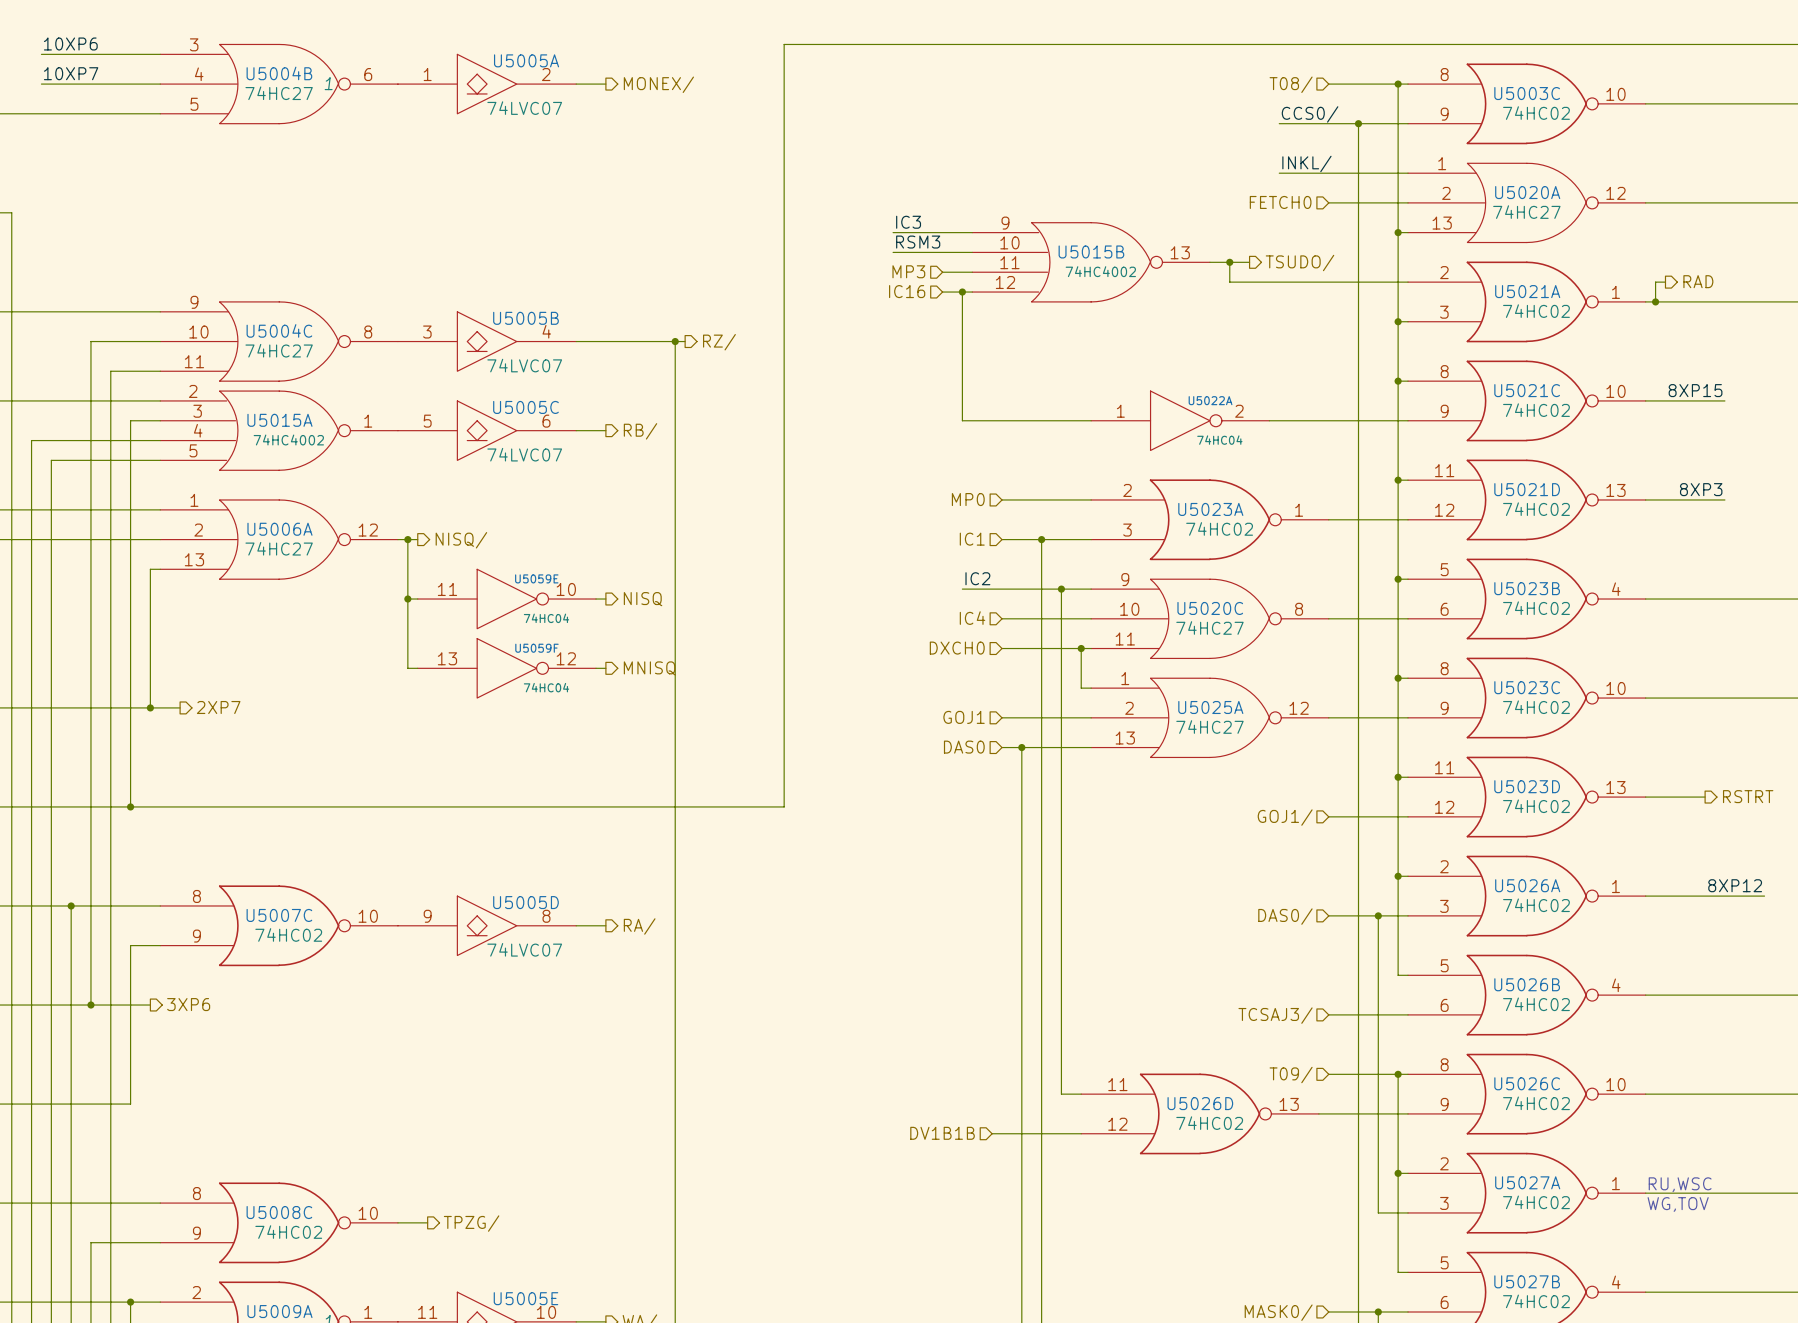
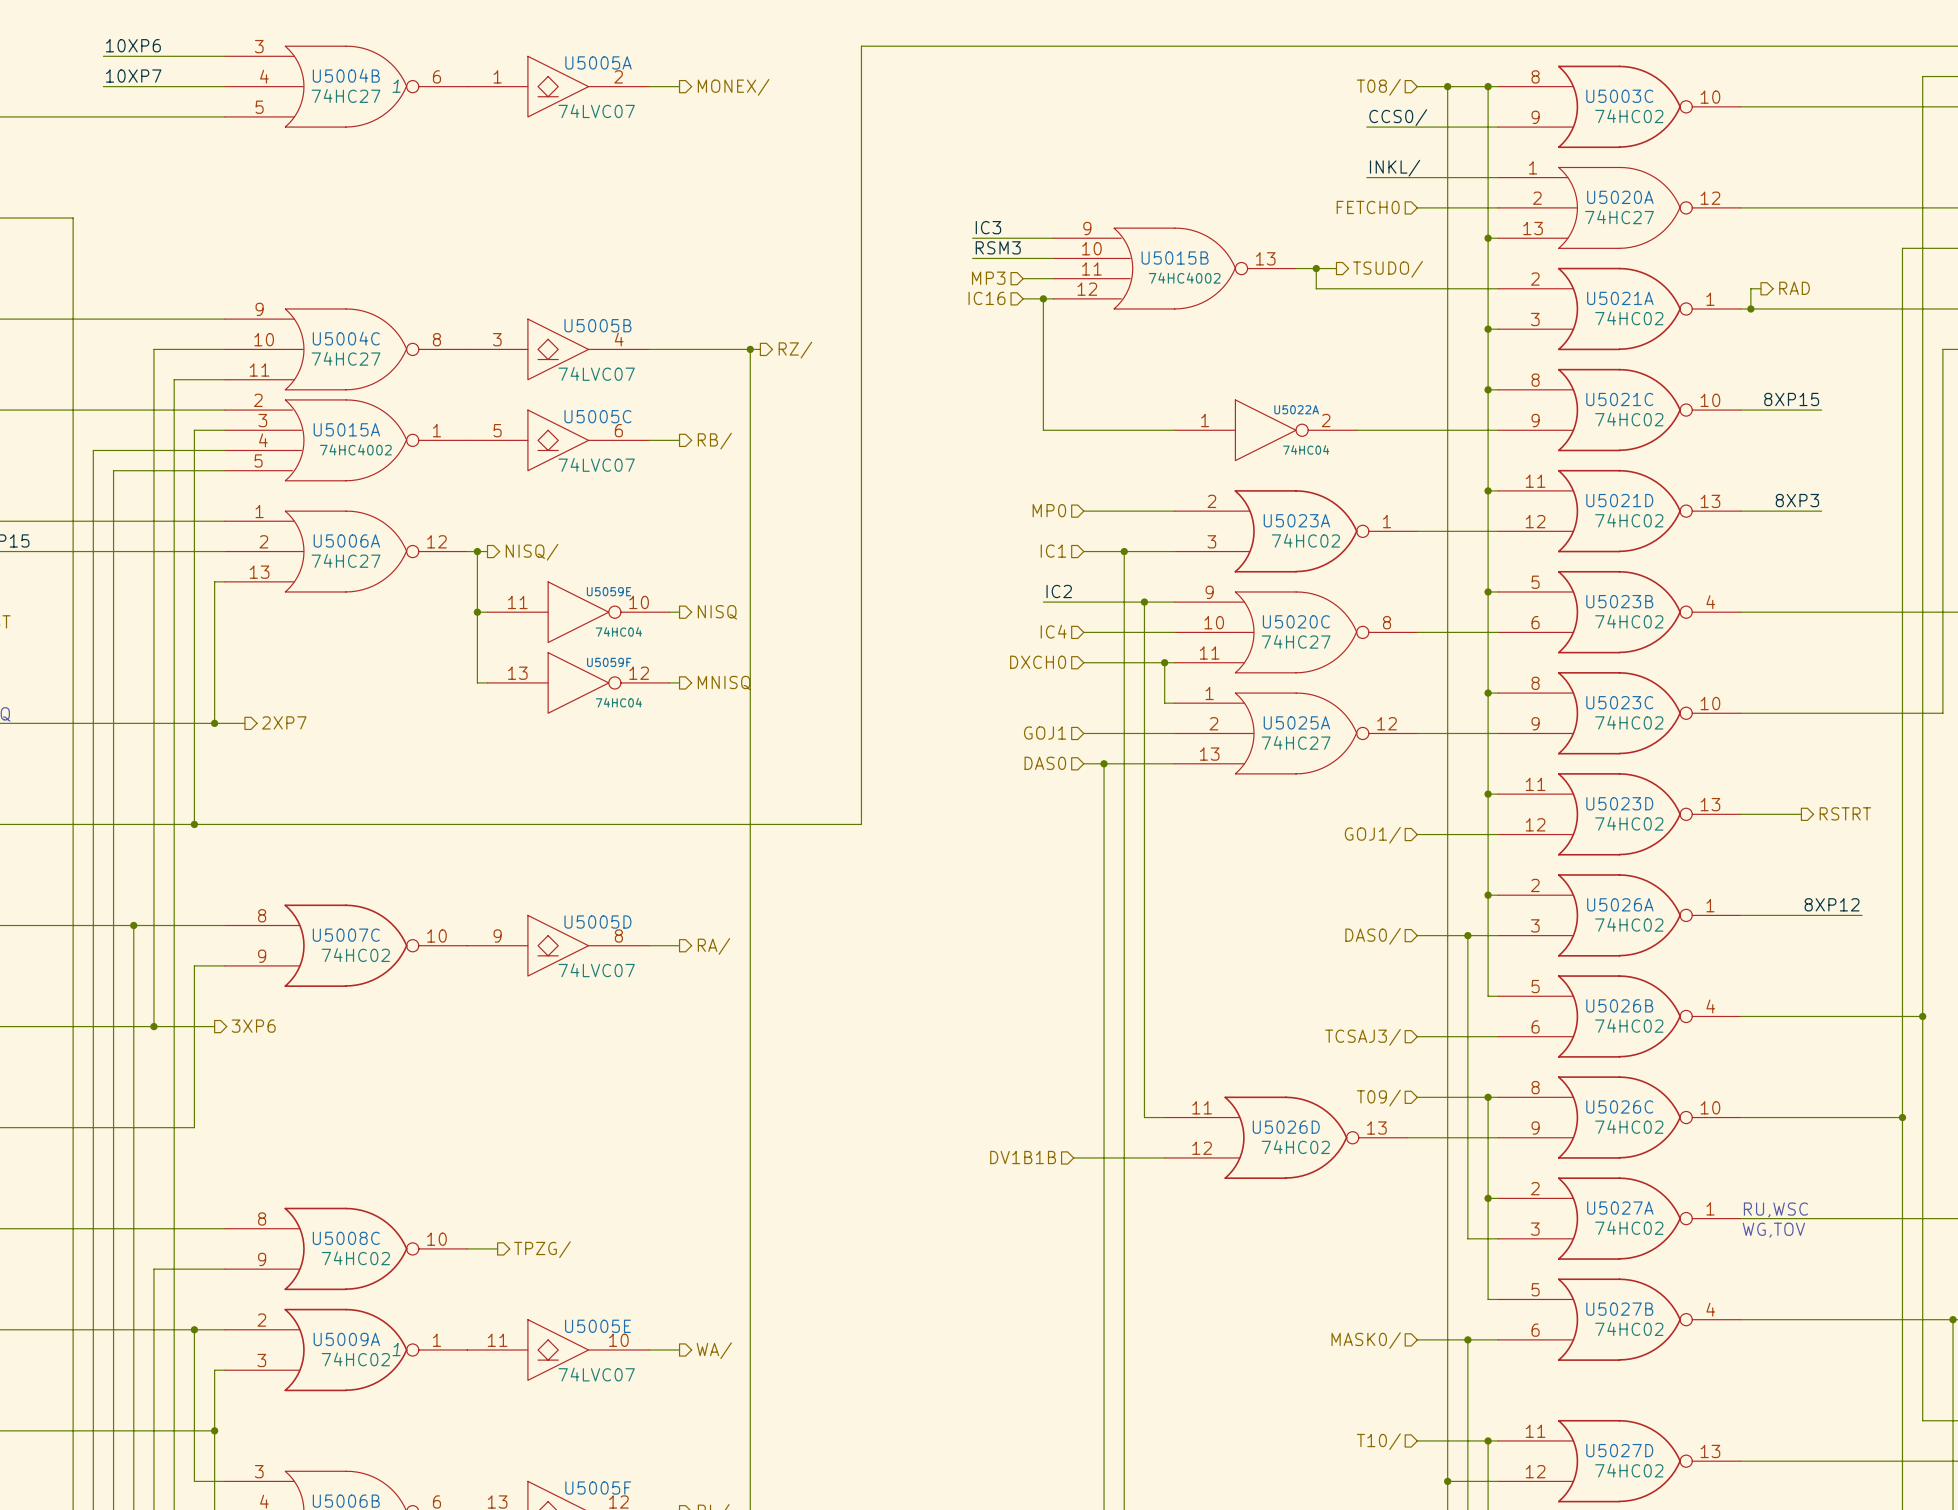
wire: none -> (1447, 86) (1447, 127)
junction position: (1358, 123) -> (1447, 86)

